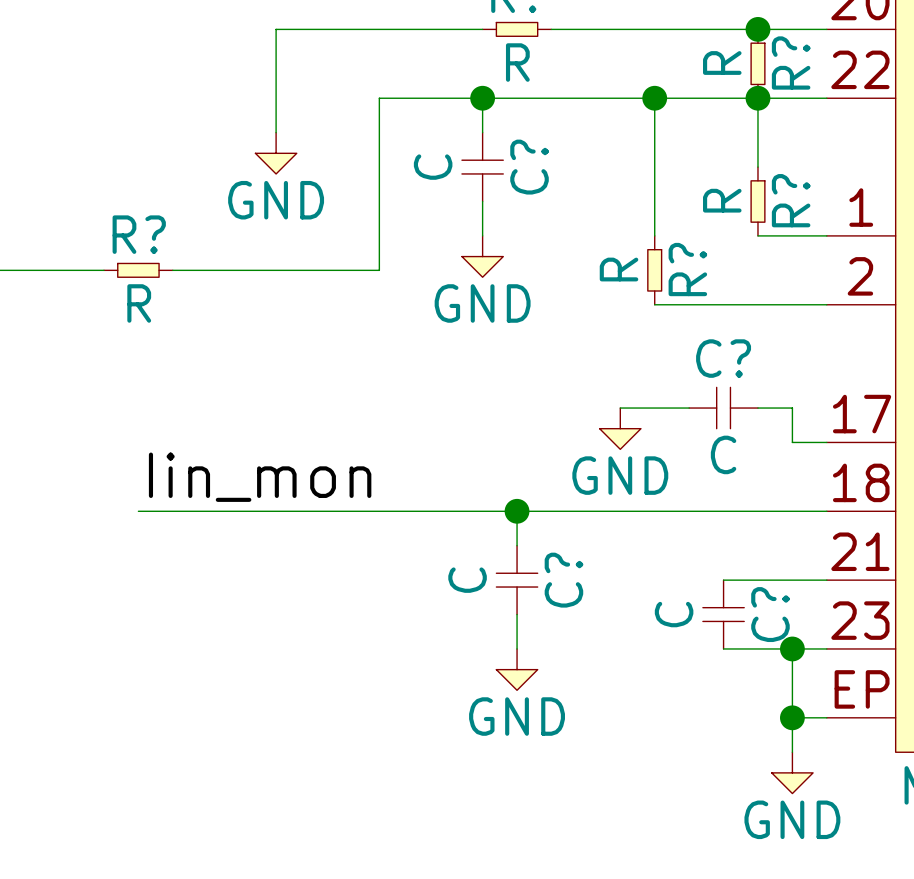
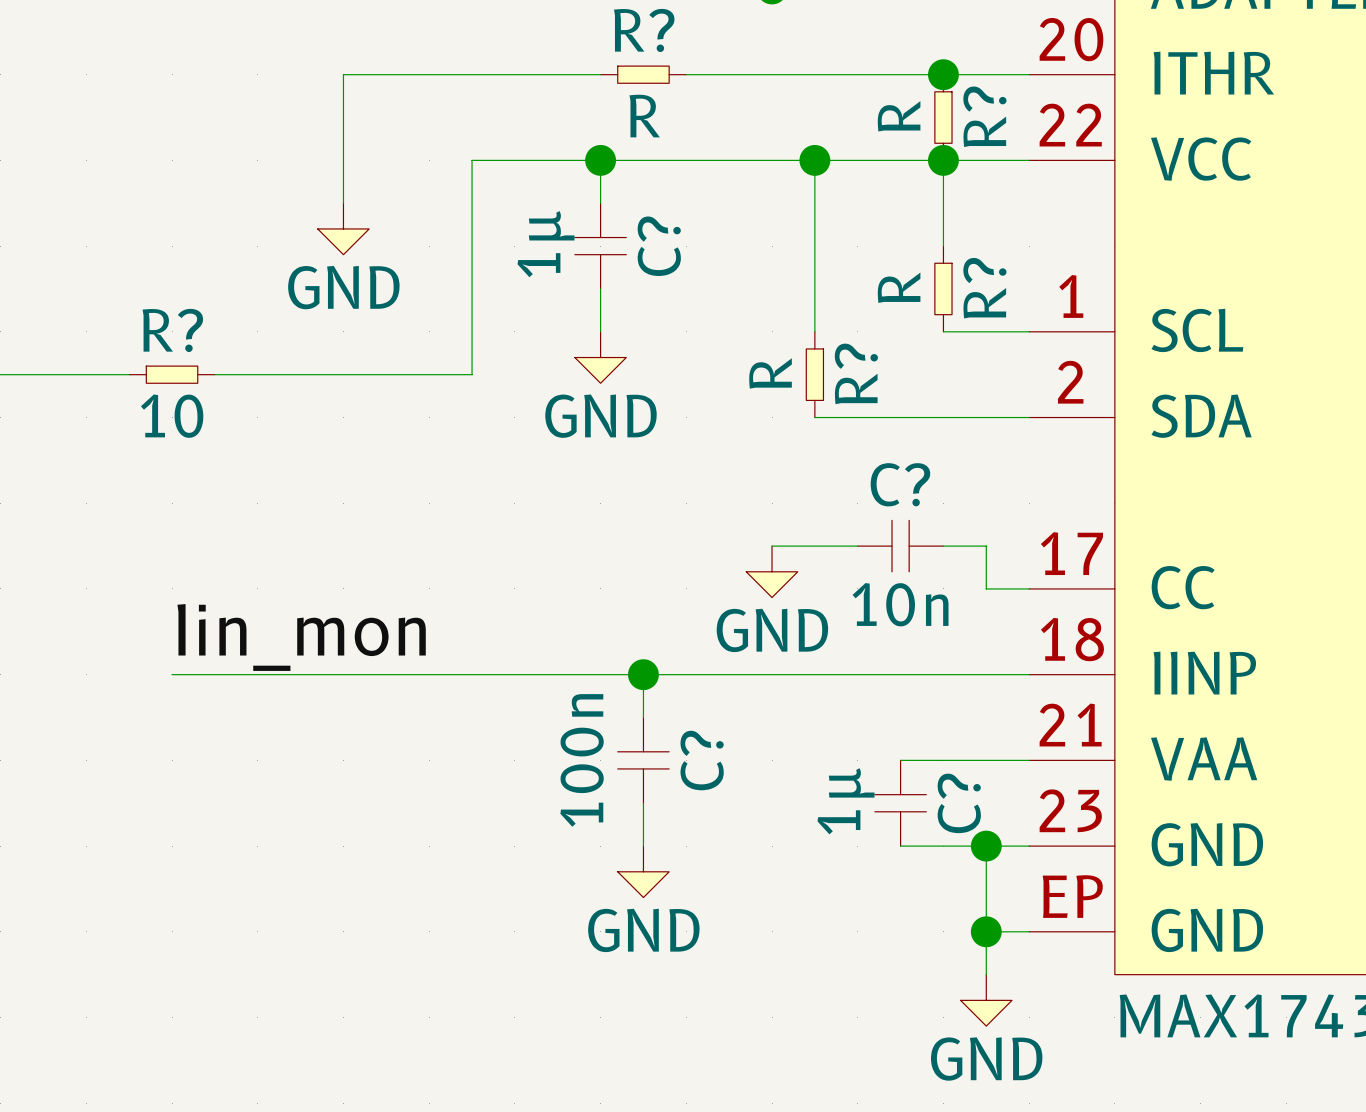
C? value: C (433, 167) -> 1µ (546, 244)
R? value: R (139, 303) -> 10 (172, 416)
C? value: C (723, 454) -> 10n (900, 604)
C? value: C (467, 580) -> 100n (582, 760)
C? value: C (674, 614) -> 1µ (846, 801)

